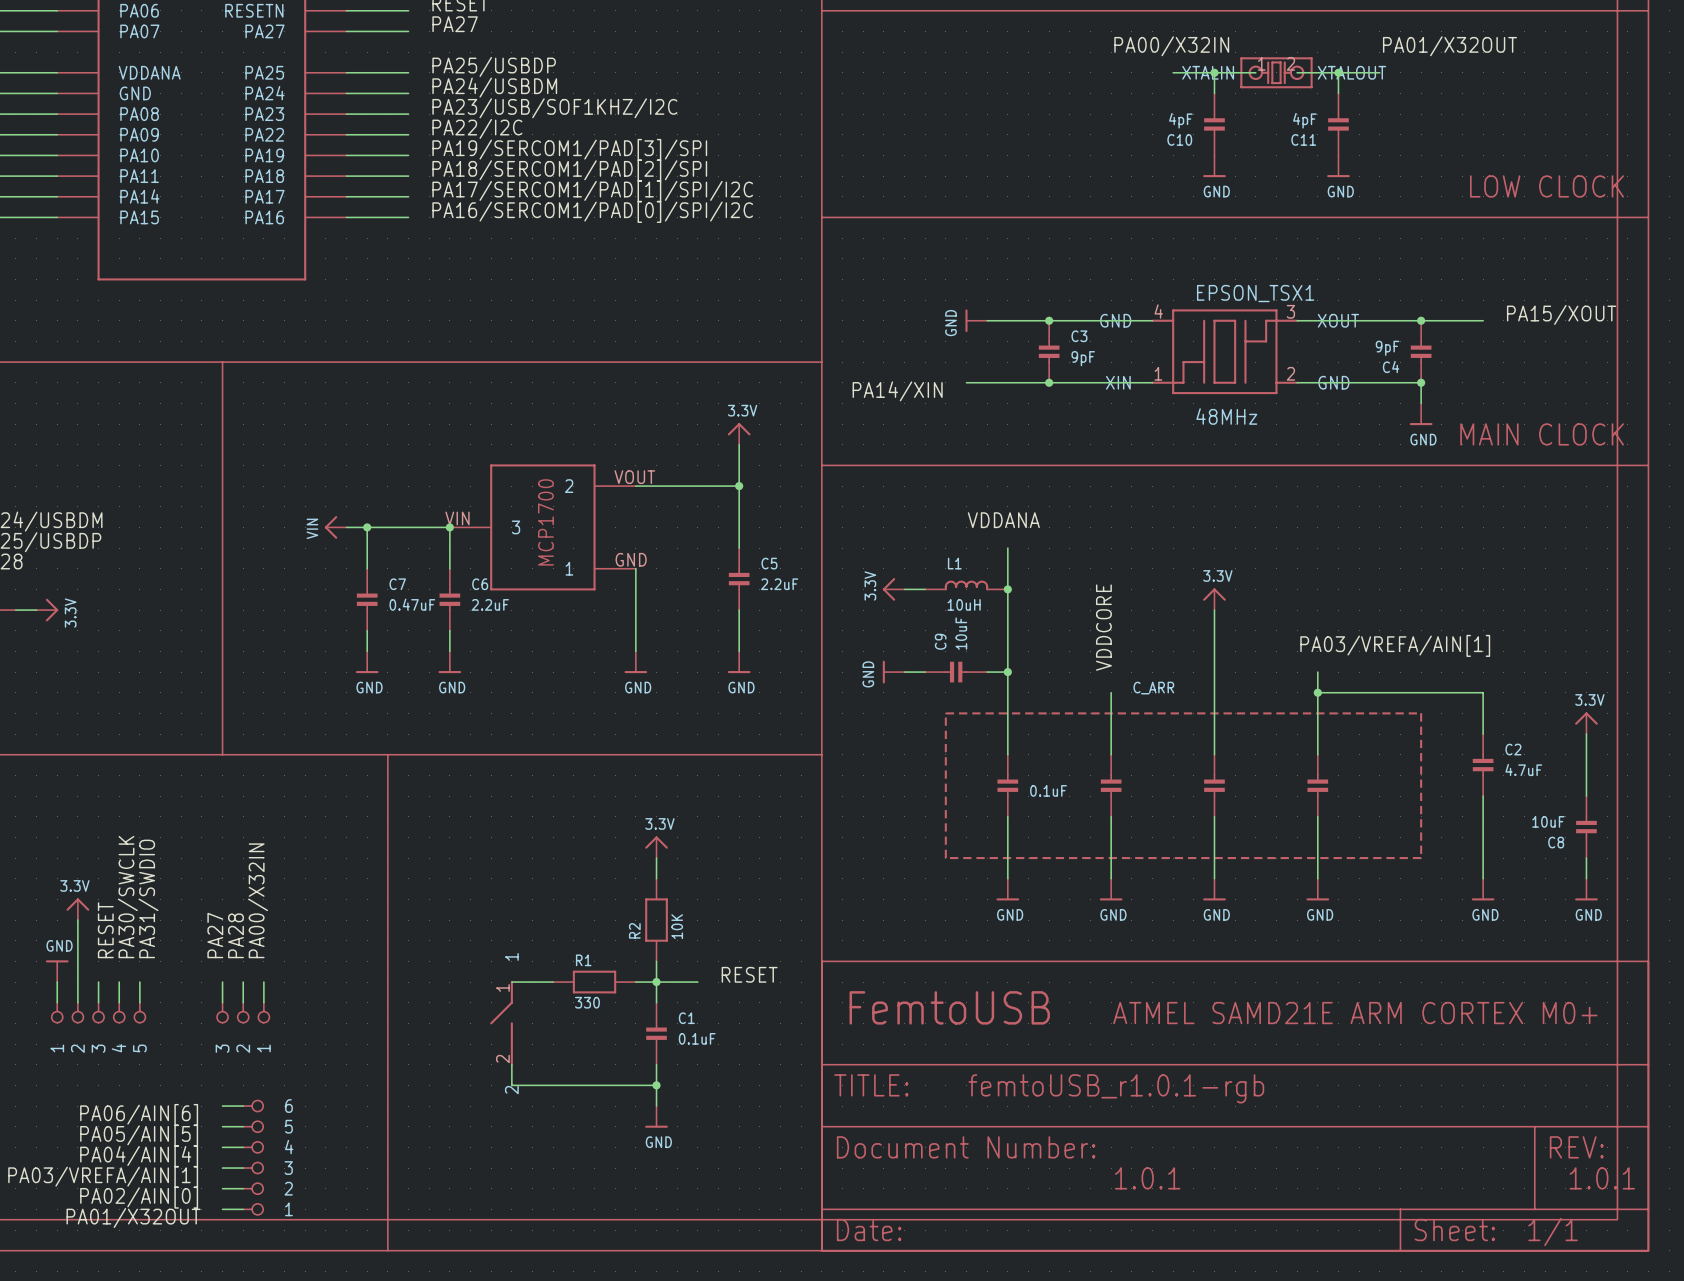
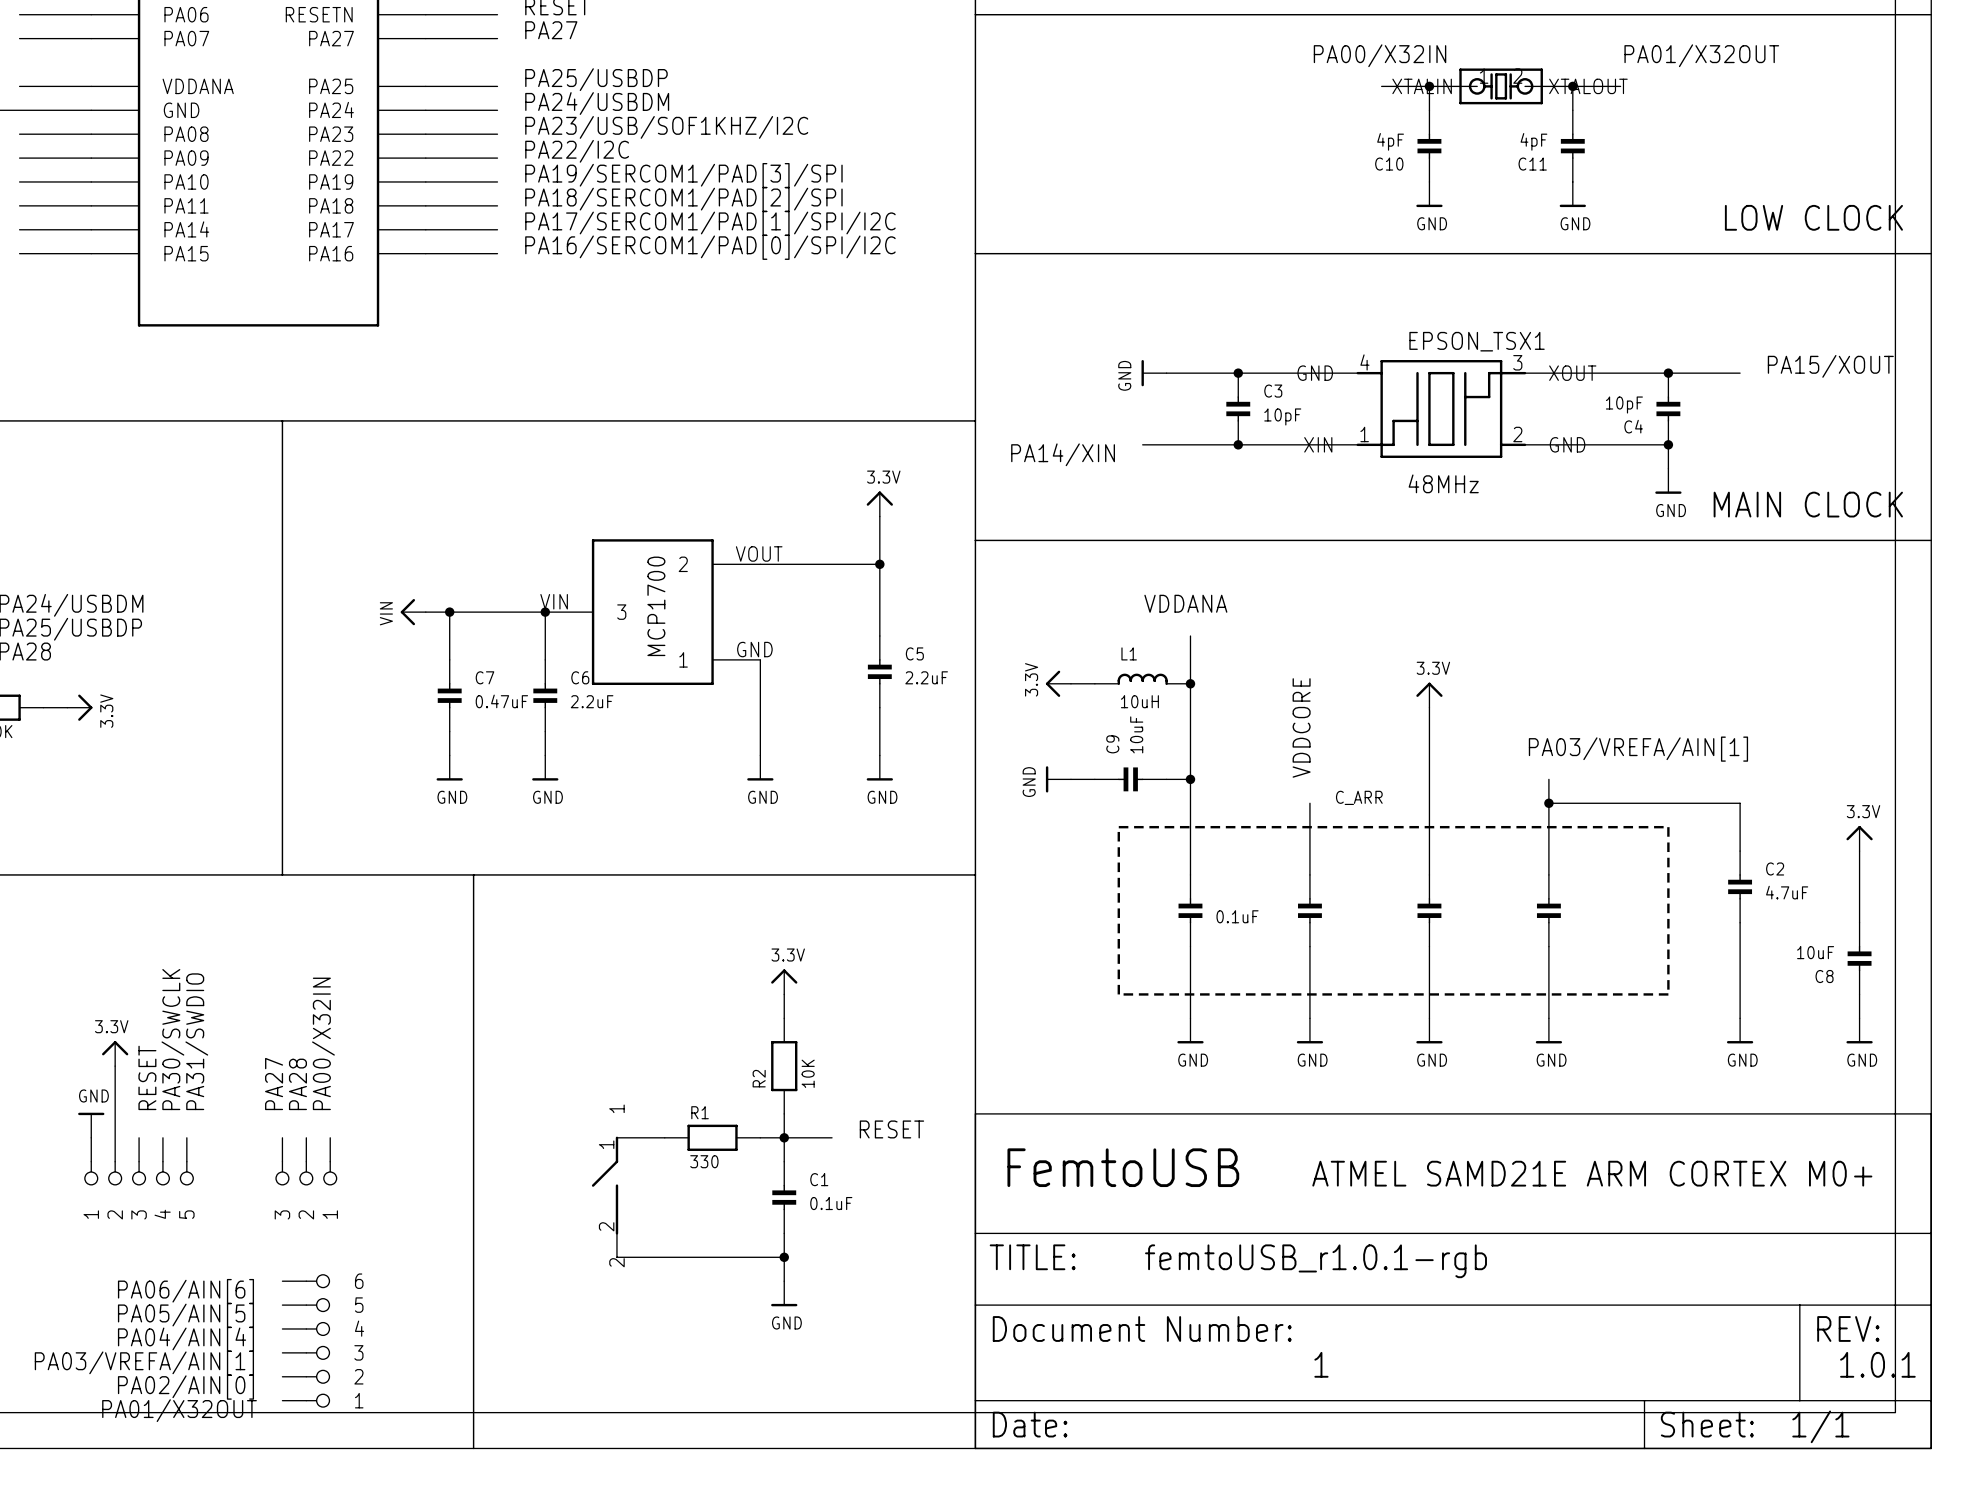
C4 value: 9pF (1387, 348) -> 10pF (1624, 405)
C3 value: 9pF (1083, 358) -> 10pF (1282, 416)
text: 1.0.1 (1147, 1178) -> 1 (1321, 1364)

